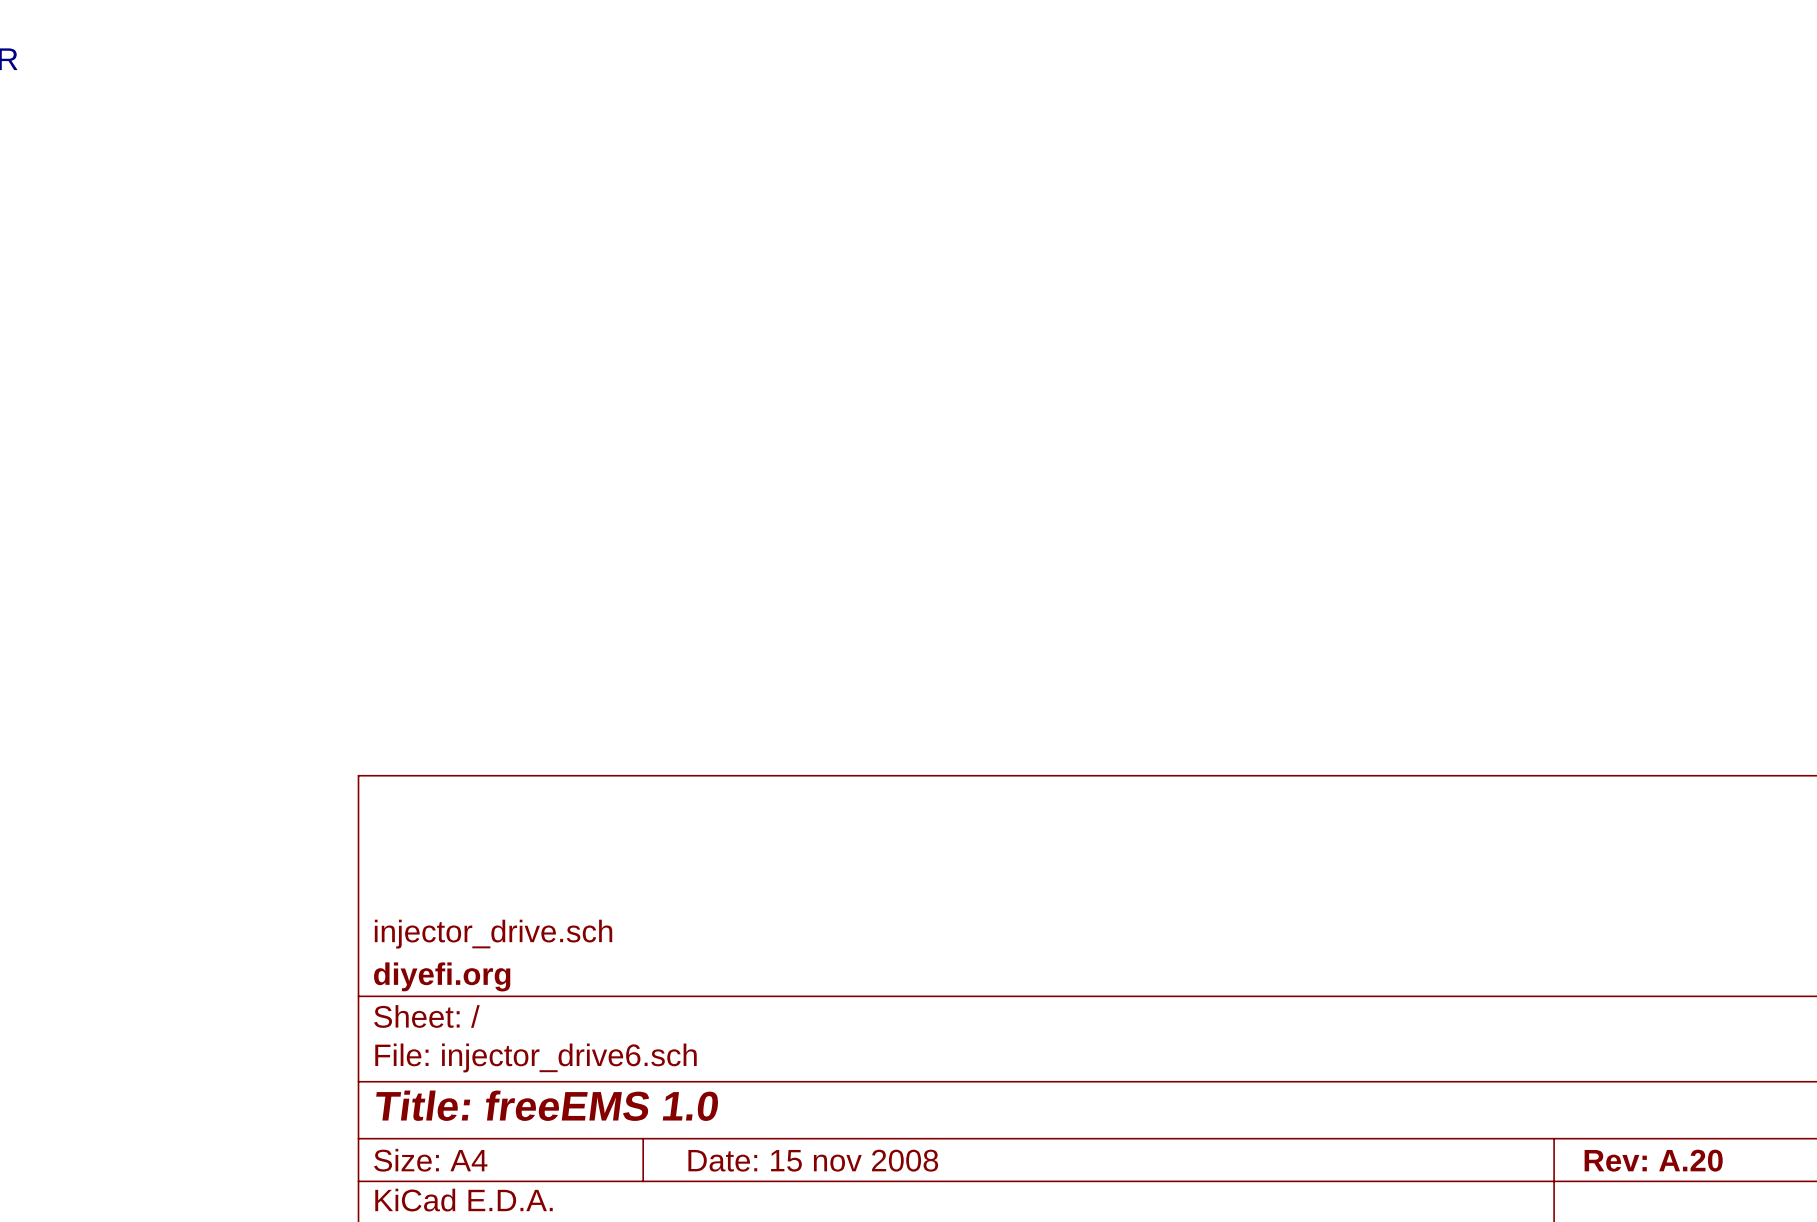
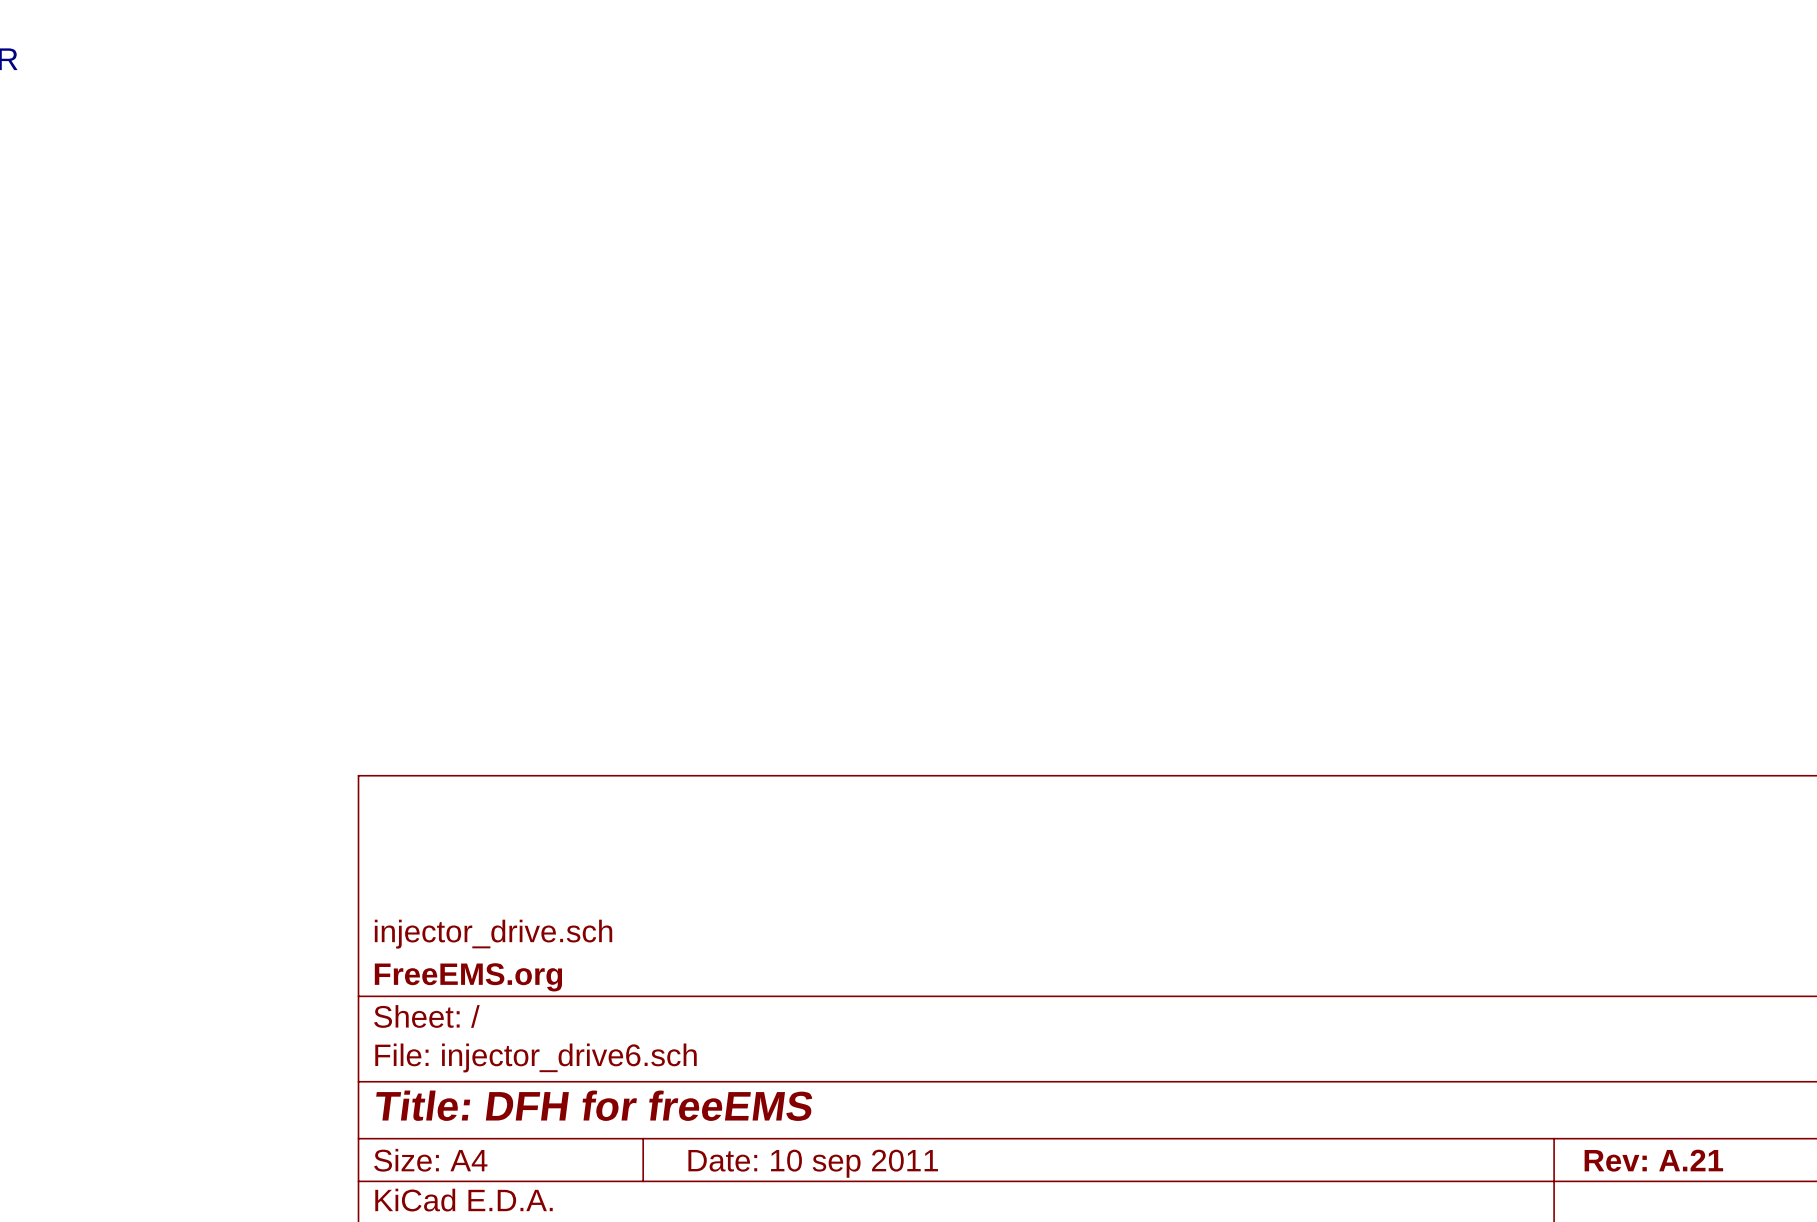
title block: diyefi.org (442, 976) -> FreeEMS.org (468, 977)
title block: Title: freeEMS 1.0 (547, 1105) -> Title: DFH for freeEMS (594, 1105)
title block: Date: 15 nov 2008 (813, 1160) -> Date: 10 sep 2011 (813, 1163)
title block: Rev: A.20 (1653, 1160) -> Rev: A.21 (1653, 1160)

